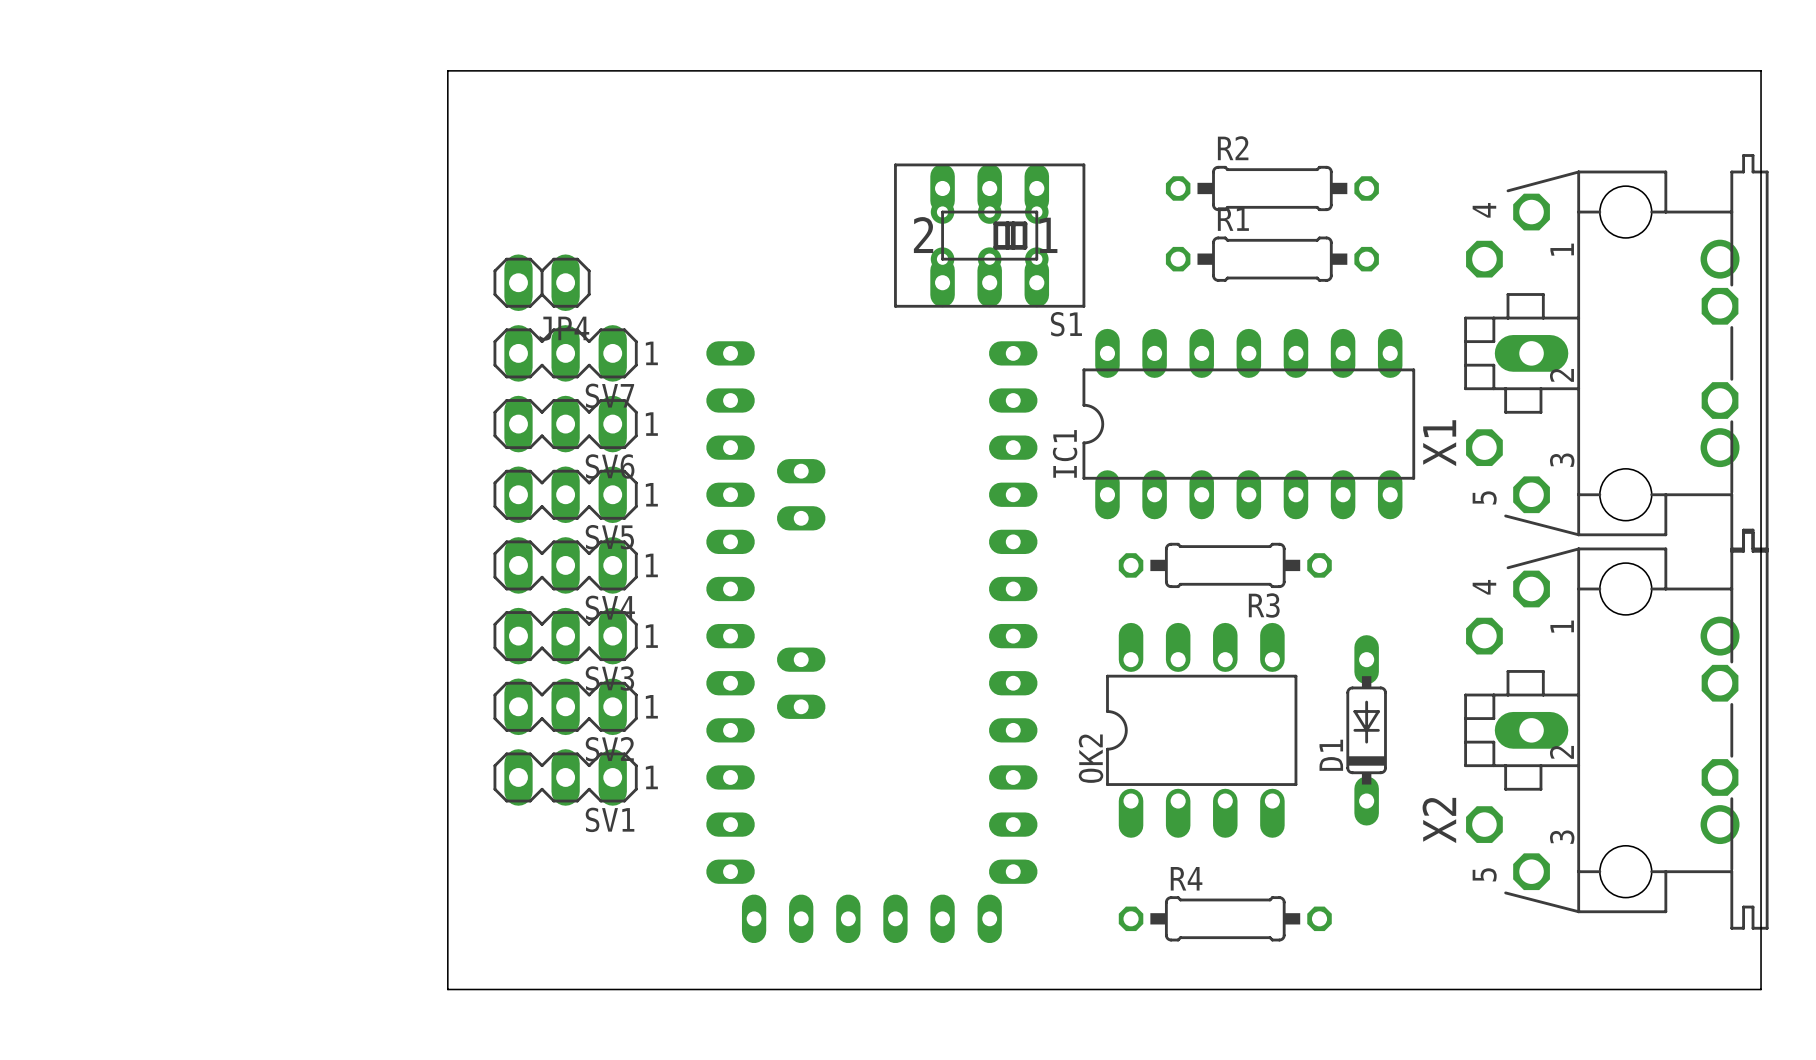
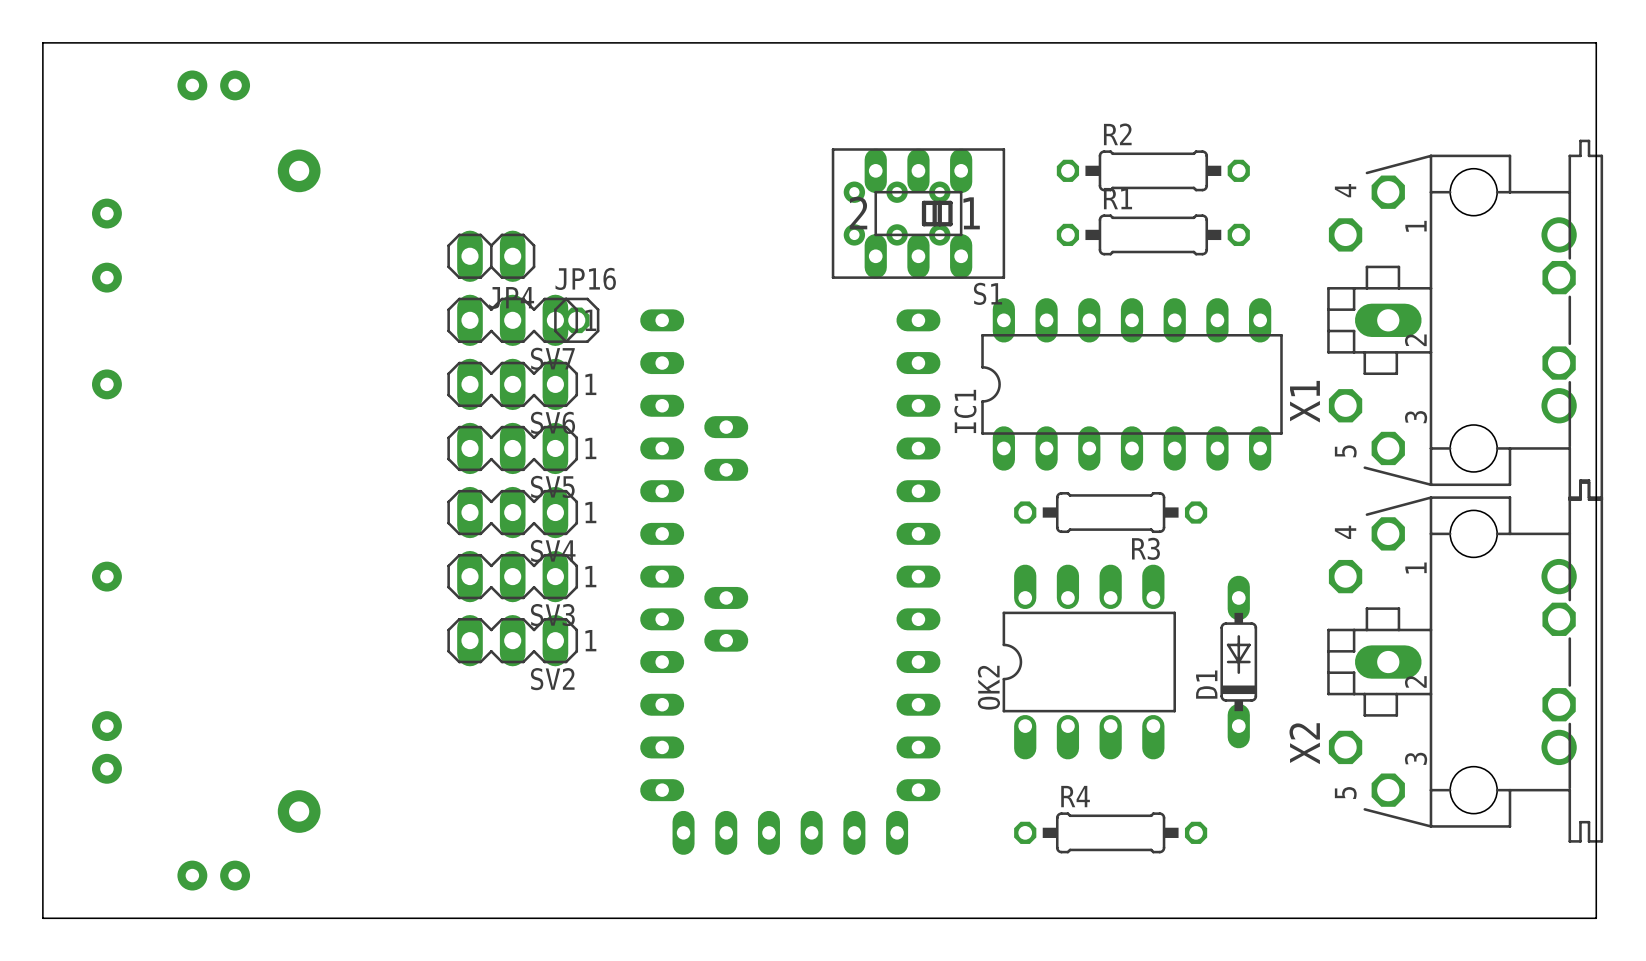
board edge: (1761, 70) (447, 70) (447, 989) (1761, 989) -> (1596, 64) (1596, 42) (42, 42) (42, 918) (1596, 918) (1596, 896)
via: none -> (192, 85)
via: none -> (235, 85)
via: none -> (299, 170)
via: none -> (106, 213)
S1 position: (989, 235) -> (918, 213)
via: none -> (106, 277)
JP16: none -> (576, 320)
via: none -> (106, 384)
via: none -> (106, 576)
SV1: (565, 777) -> none
via: none -> (106, 726)
via: none -> (106, 768)
via: none -> (299, 811)
via: none -> (192, 875)
via: none -> (235, 875)

